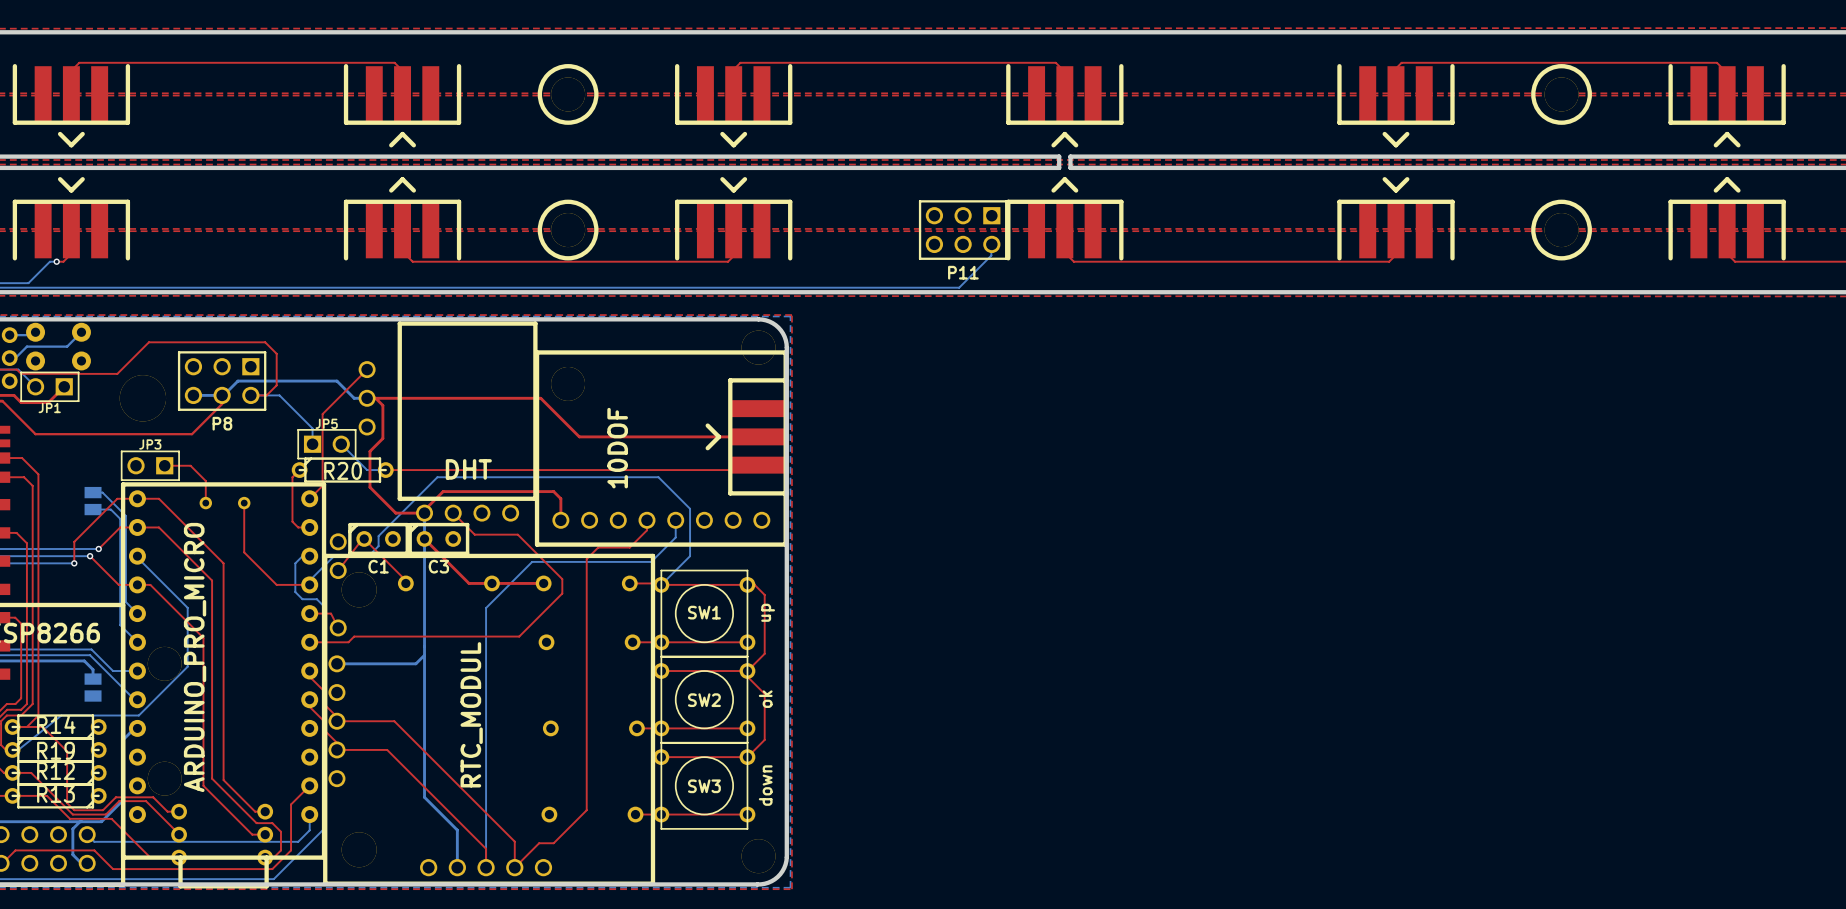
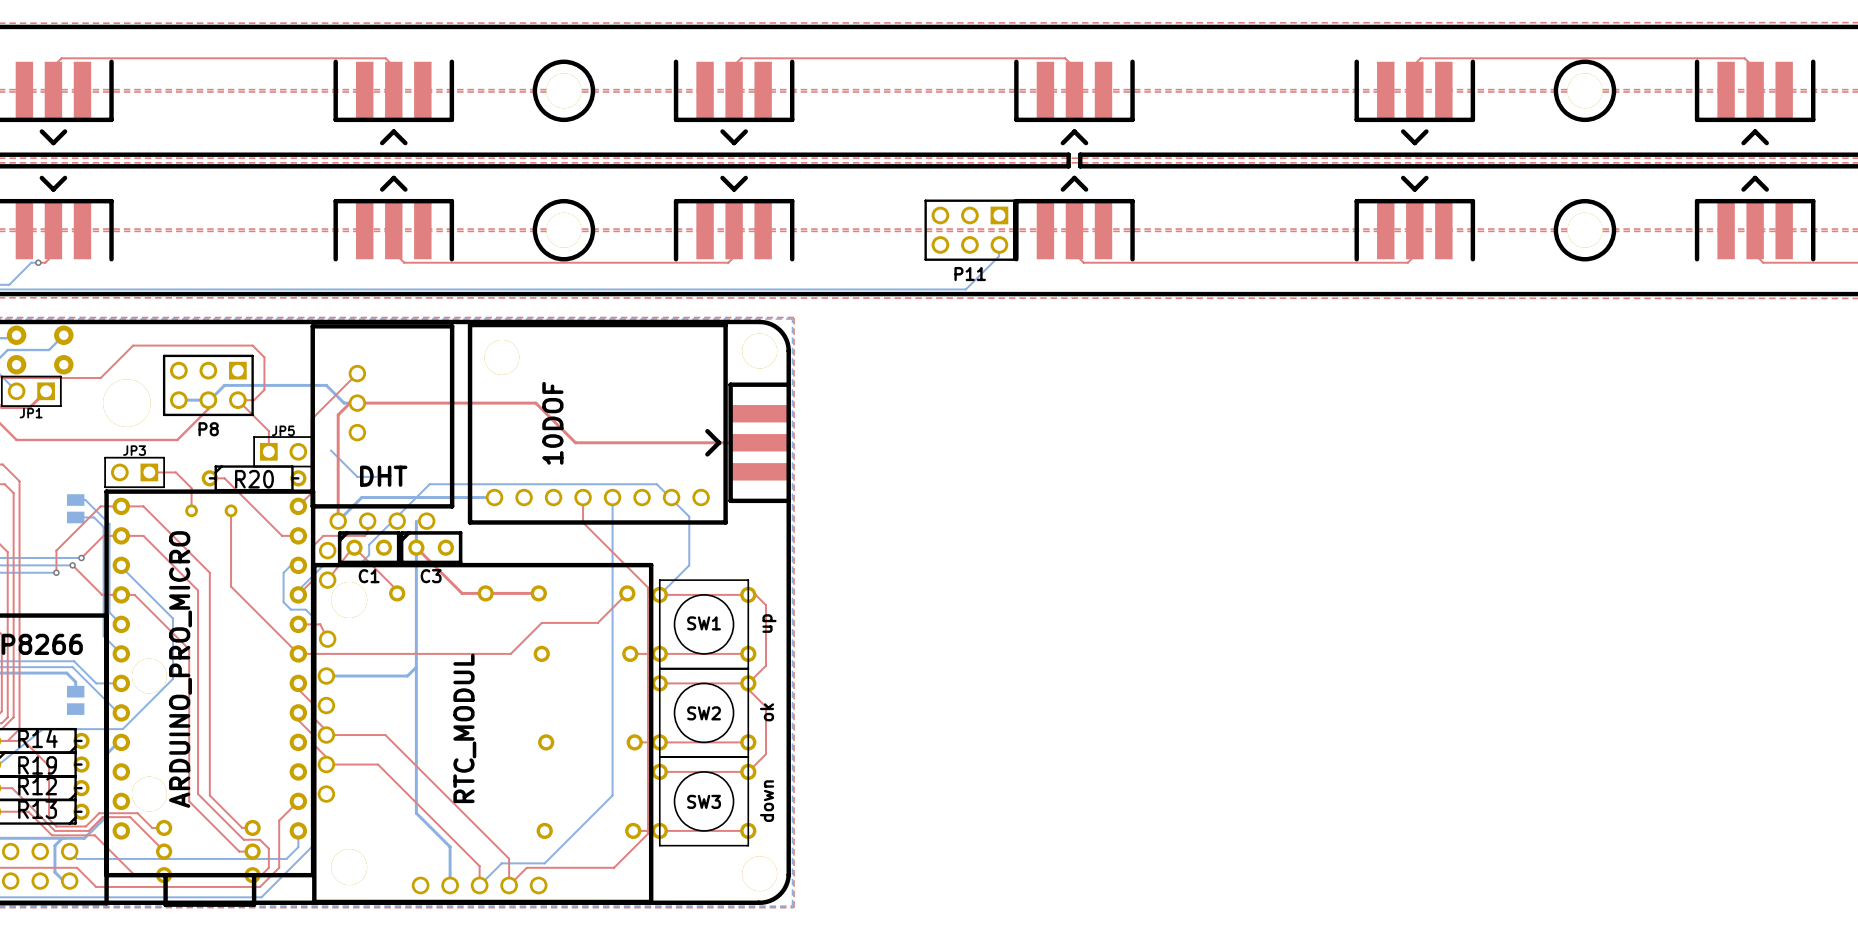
bottom track: (250, 395) (279, 395) (312, 428) (312, 444) -> none
top track: none -> (237, 400) (268, 431) (268, 451)
top track: none -> (357, 403) (349, 403) (338, 414) (338, 521)
top track: (375, 398) (382, 405) (382, 438) (369, 451) (369, 487) (395, 513) (424, 513) (424, 510) (443, 491) (553, 491) (560, 498) (560, 520) -> none
part position: (467, 421) -> (382, 426)
JP5 position: (326, 444) -> (283, 451)
part position: (661, 448) -> (597, 423)
top track: (758, 465) (753, 470) (385, 470) -> none
top track: (299, 470) (292, 477) (292, 521) (298, 527) -> (209, 478) (224, 478) (282, 535) (286, 535)
R20 position: (342, 470) -> (254, 478)
bottom track: none -> (494, 497) (361, 497) (338, 521)
top track: none -> (367, 521) (367, 532) (364, 535) (323, 535) (313, 546) (313, 580) (298, 594)
top track: (453, 513) (474, 534) (517, 534) (562, 579) (562, 593) (519, 636) (354, 636) (348, 642) -> (627, 593) (597, 622) (541, 622) (510, 653) (338, 653)
top track: (647, 520) (647, 530) (629, 547) (598, 547) (586, 559) (586, 810) (553, 843) (539, 843) (531, 850) -> (583, 497) (583, 522) (647, 587) (647, 833) (614, 867) (526, 867)
bottom track: (675, 520) (675, 537) (651, 561) (532, 561) (486, 608) (486, 867) -> (612, 497) (612, 795) (544, 863) (501, 863) (479, 885)
top track: (244, 552) (276, 584) (309, 584) -> (231, 561) (231, 586) (298, 653)
top track: (629, 583) (661, 584) -> none

